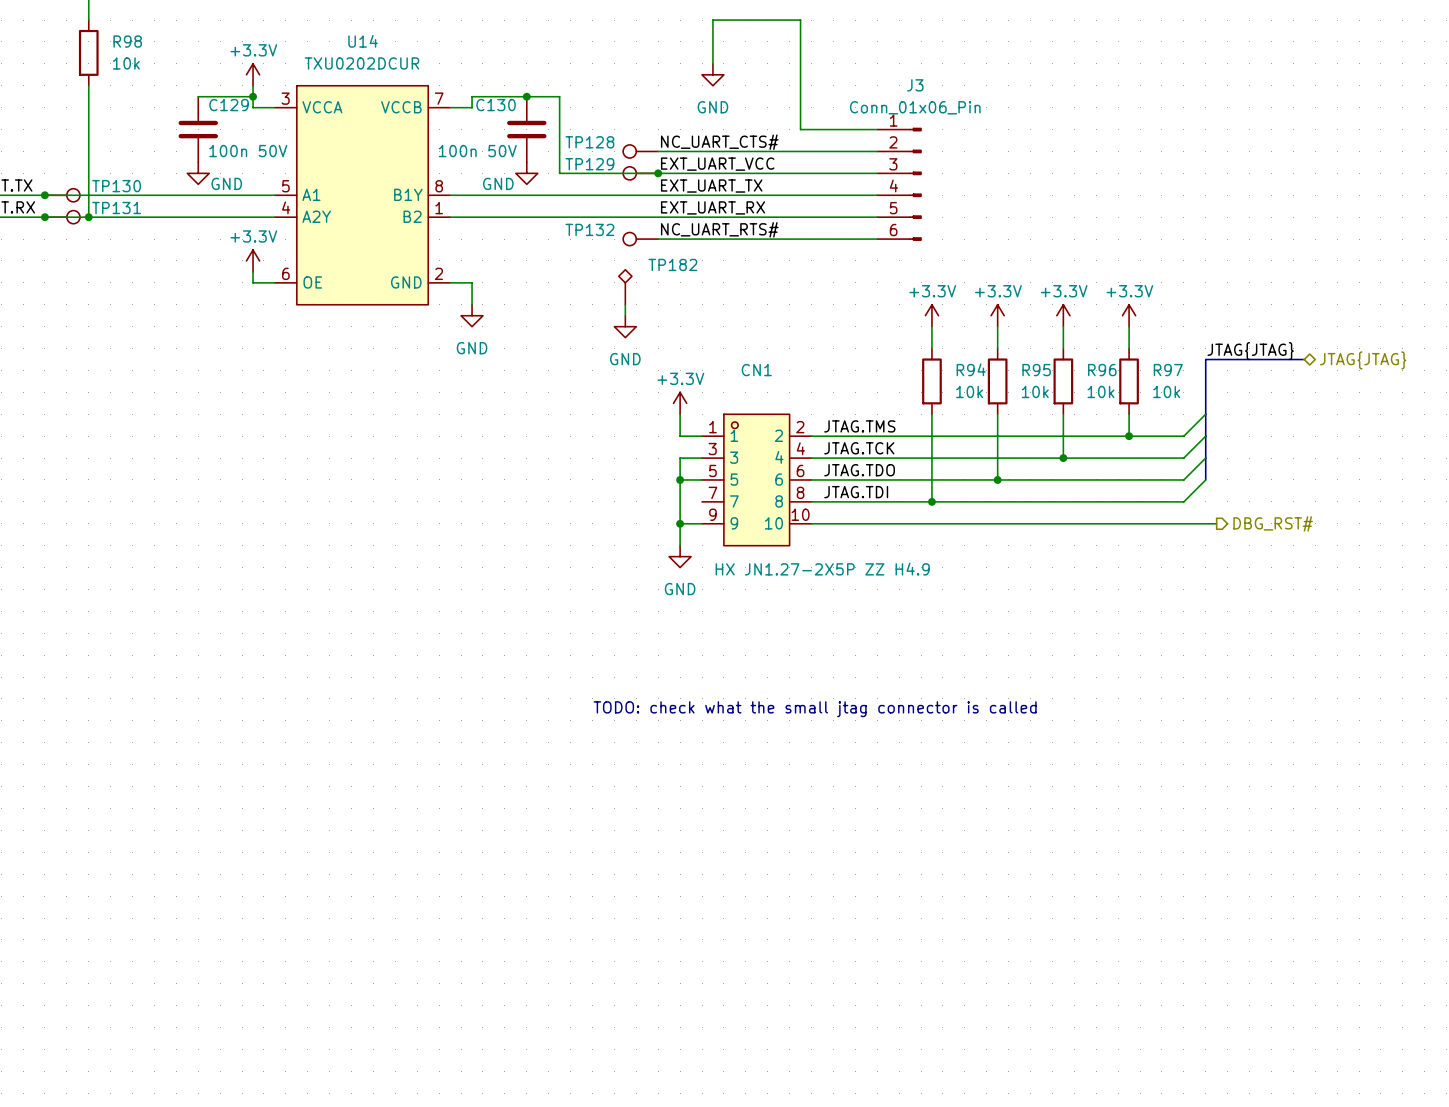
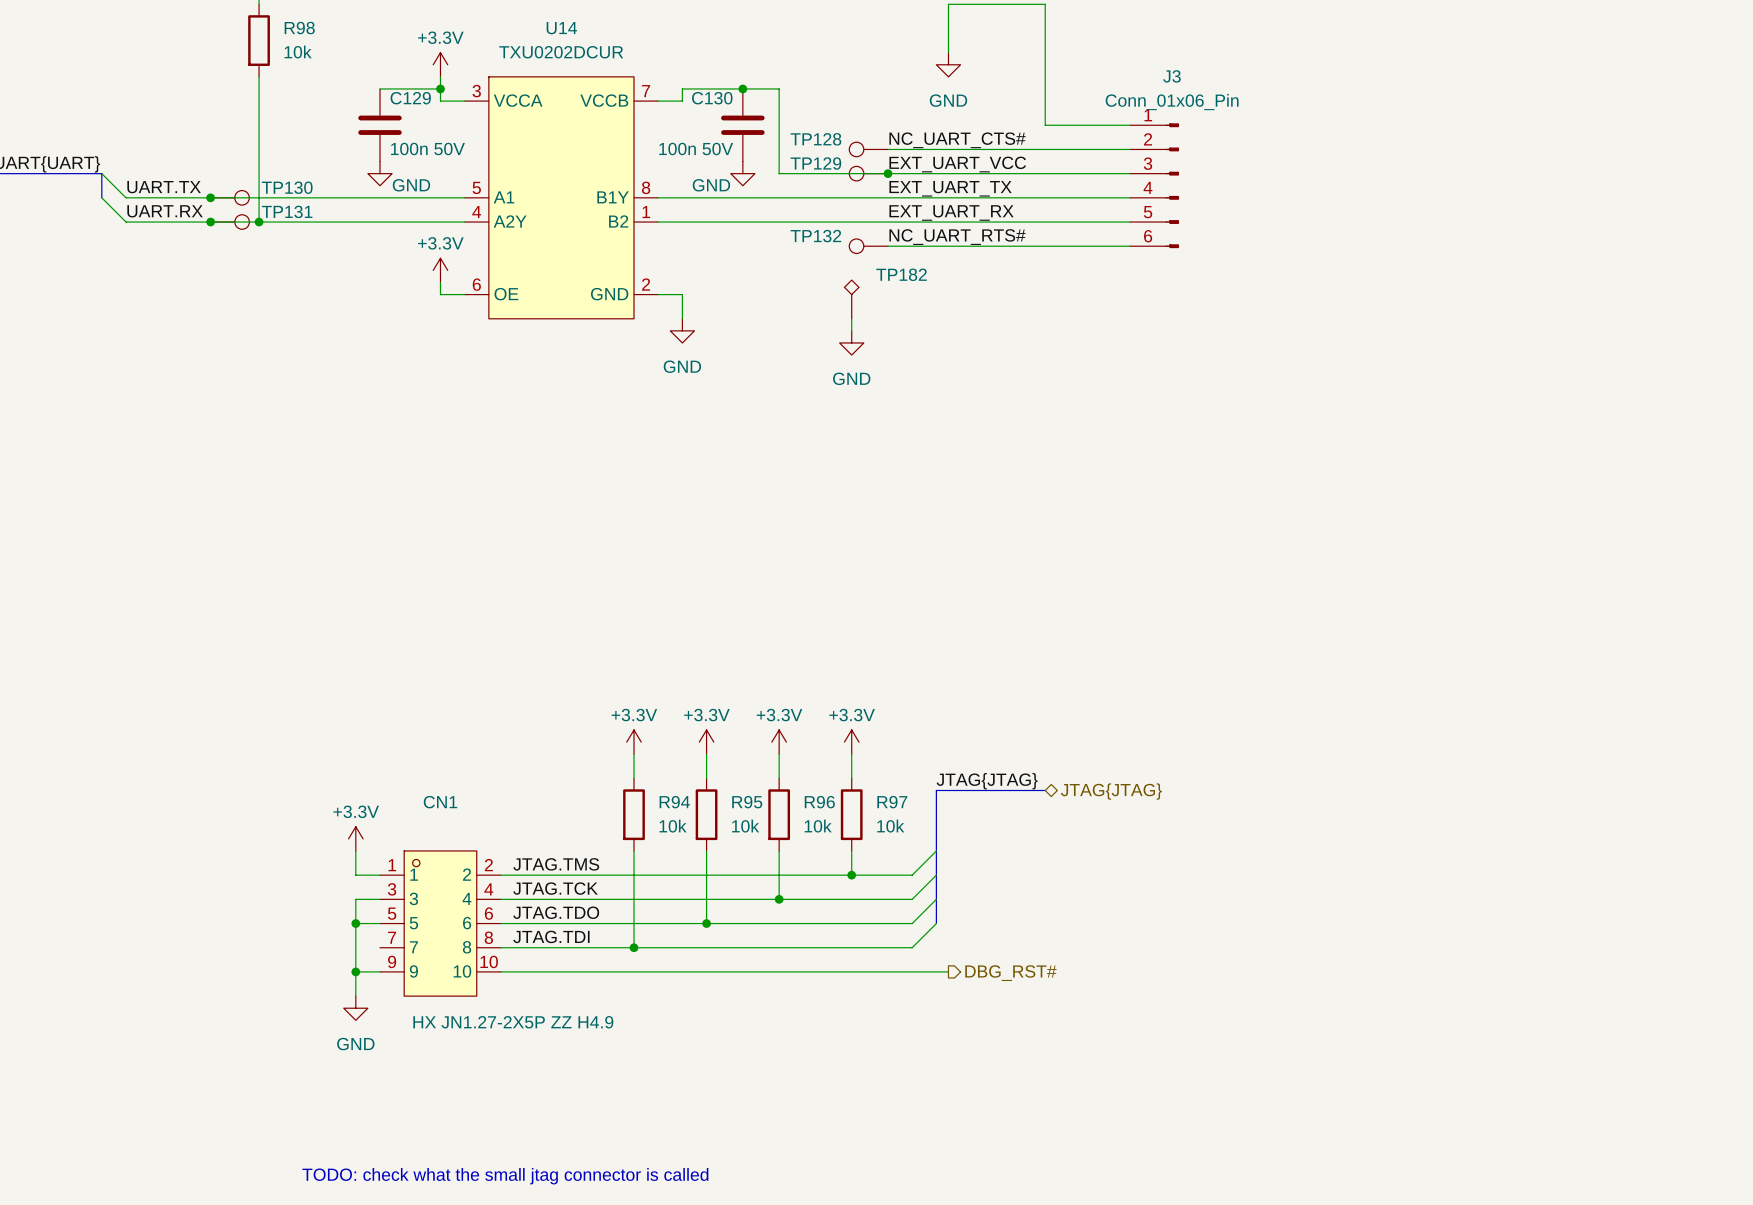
power symbol: +3.3V (931, 315) -> none
power symbol: +3.3V (997, 315) -> none
power symbol: +3.3V (1063, 315) -> none
power symbol: +3.3V (1129, 315) -> none
wire: (931, 326) (931, 348) -> none
wire: (997, 326) (997, 348) -> none
wire: (1063, 326) (1063, 348) -> none
wire: (1129, 326) (1129, 348) -> none
label: JTAG{JTAG} (1250, 351) -> none
bus: (1304, 359) (1205, 359) (1205, 479) -> none
hierarchical label: JTAG{JTAG} (1363, 360) -> none
R94 position: (931, 381) -> (634, 814)
R95 position: (997, 381) -> (706, 814)
R96 position: (1063, 381) -> (779, 814)
R97 position: (1129, 381) -> (851, 814)
power symbol: +3.3V (680, 403) -> none
wire: (680, 414) (680, 436) (702, 436) -> none
wire: (931, 414) (931, 501) -> none
wire: (997, 414) (997, 479) -> none
wire: (1063, 414) (1063, 458) -> none
wire: (1129, 414) (1129, 436) -> none
wire: (1205, 414) (1183, 436) (811, 436) -> none
label: JTAG.TMS (859, 426) -> none
junction: (1129, 436) -> none
wire: (1205, 436) (1183, 458) (811, 458) -> none
label: JTAG.TCK (859, 448) -> none
wire: (702, 458) (680, 458) (680, 545) -> none
junction: (1063, 458) -> none
wire: (1205, 458) (1183, 479) (811, 479) -> none
label: JTAG.TDO (859, 470) -> none
wire: (680, 479) (702, 479) -> none
junction: (680, 479) -> none
CN1 position: (756, 479) -> (440, 923)
junction: (997, 479) -> none
wire: (1205, 479) (1183, 501) (811, 501) -> none
label: JTAG.TDI (856, 492) -> none
junction: (931, 501) -> none
wire: (680, 523) (702, 523) -> none
junction: (680, 523) -> none
wire: (811, 523) (1216, 523) -> none
hierarchical label: DBG_RST# (1273, 523) -> none
power symbol: GND (680, 556) -> none
power symbol: none -> +3.3V (634, 742)
power symbol: none -> +3.3V (706, 742)
power symbol: none -> +3.3V (779, 742)
power symbol: none -> +3.3V (851, 742)
wire: none -> (634, 754) (634, 778)
wire: none -> (706, 754) (706, 778)
wire: none -> (779, 754) (779, 778)
wire: none -> (851, 754) (851, 778)
text: TODO: check what the small jtag connector is called (815, 709) -> none
label: none -> JTAG{JTAG} (987, 781)
bus: none -> (1045, 790) (936, 790) (936, 923)
hierarchical label: none -> JTAG{JTAG} (1111, 791)
power symbol: none -> +3.3V (355, 838)
wire: none -> (355, 850) (355, 875) (380, 875)
wire: none -> (634, 850) (634, 947)
wire: none -> (706, 850) (706, 923)
wire: none -> (779, 850) (779, 899)
wire: none -> (851, 850) (851, 875)
wire: none -> (936, 850) (912, 875) (500, 875)
label: none -> JTAG.TMS (556, 864)
junction: none -> (851, 875)
wire: none -> (936, 875) (912, 899) (500, 899)
label: none -> JTAG.TCK (555, 888)
wire: none -> (380, 899) (355, 899) (355, 996)
junction: none -> (779, 899)
wire: none -> (936, 899) (912, 923) (500, 923)
label: none -> JTAG.TDO (556, 912)
wire: none -> (355, 923) (380, 923)
junction: none -> (355, 923)
junction: none -> (706, 923)
wire: none -> (936, 923) (912, 947) (500, 947)
label: none -> JTAG.TDI (551, 936)
junction: none -> (634, 947)
wire: none -> (355, 971) (380, 971)
junction: none -> (355, 971)
wire: none -> (500, 971) (948, 971)
hierarchical label: none -> DBG_RST# (1010, 973)
power symbol: none -> GND (355, 1008)
text: none -> TODO: check what the small jtag connector is called (505, 1176)

